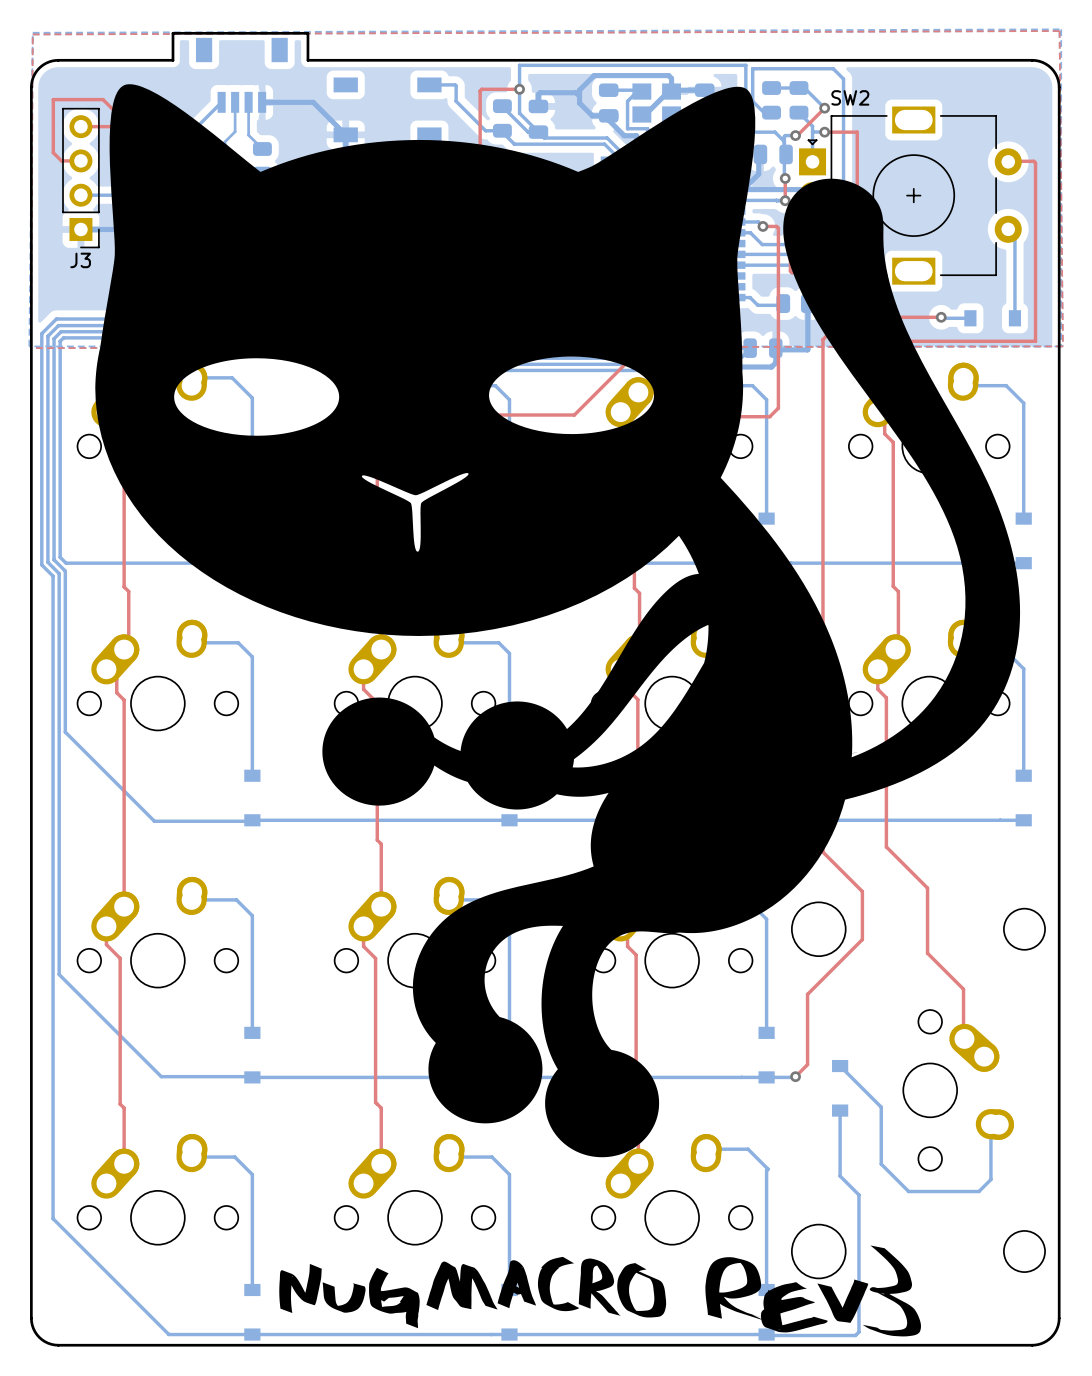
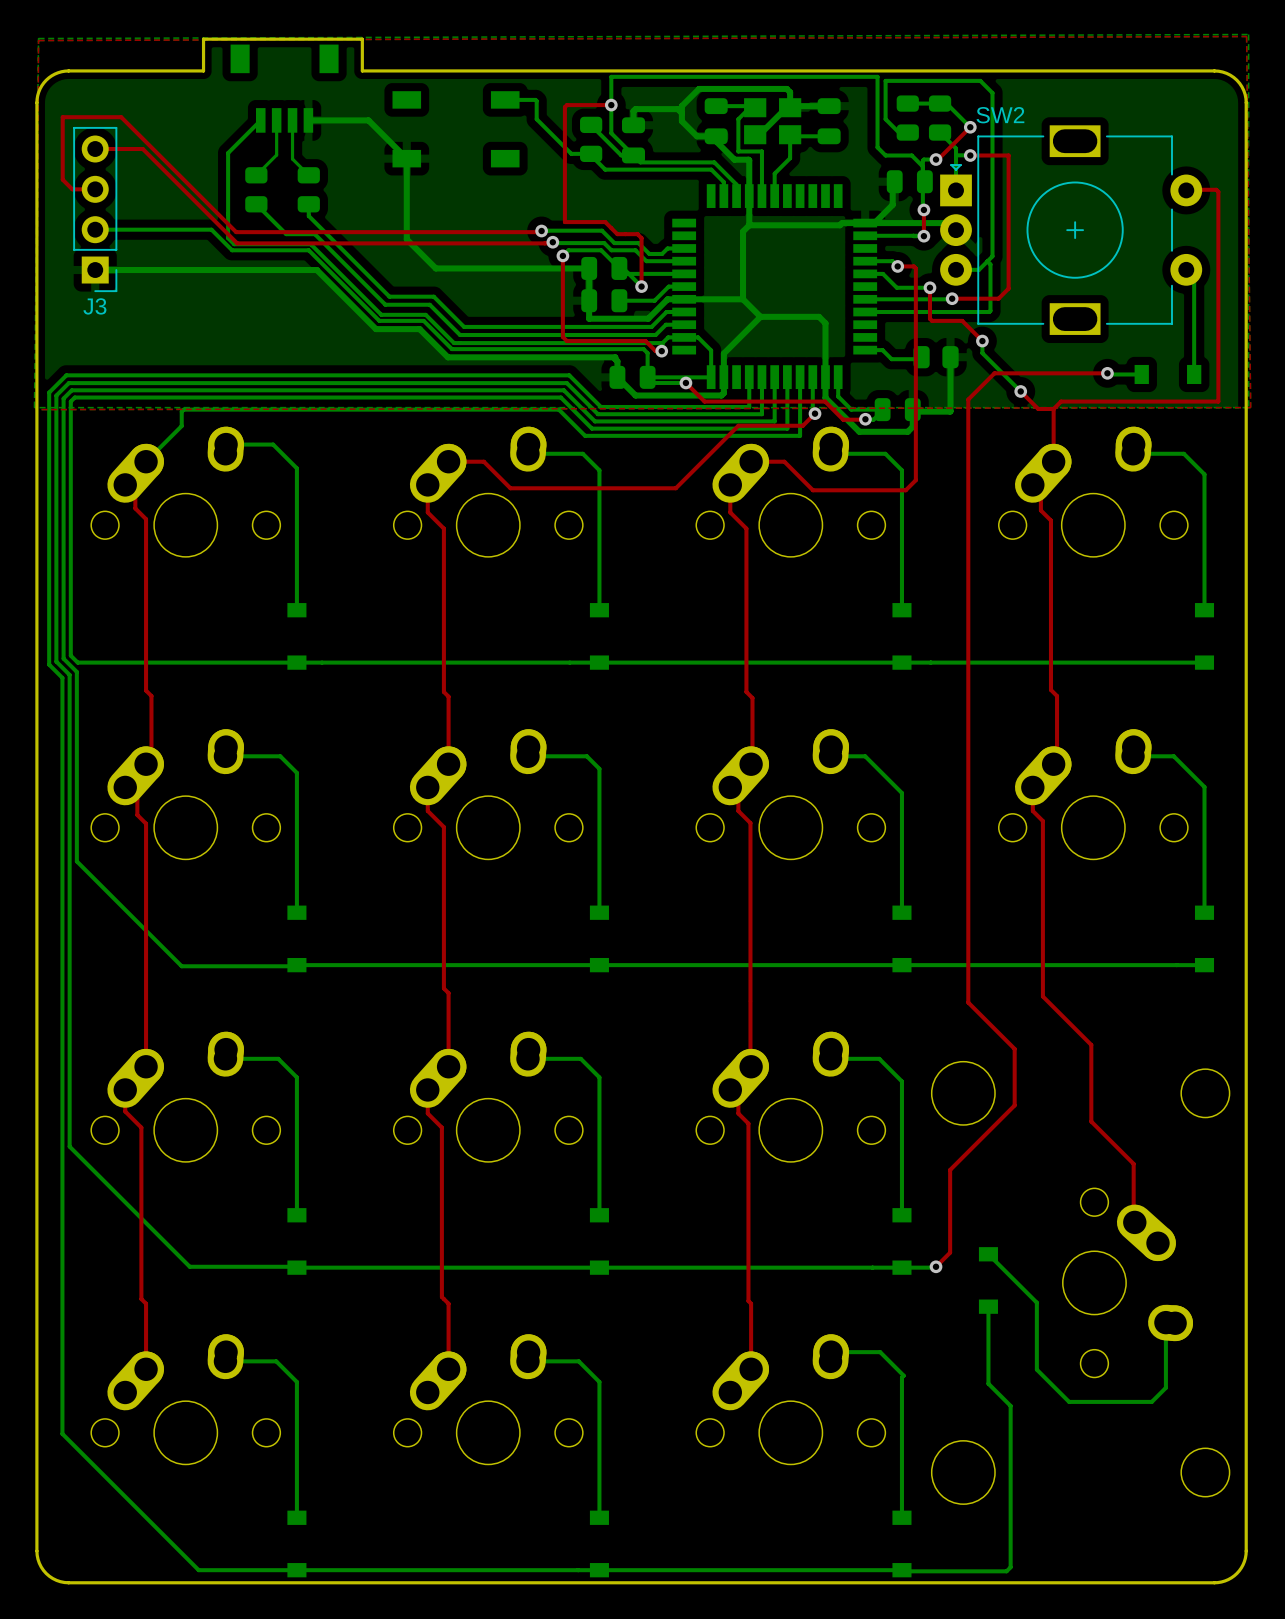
drawing: [95, 84, 1021, 1158] -> none
drawing: [705, 1245, 921, 1337] -> none
drawing: [279, 1256, 667, 1329] -> none

